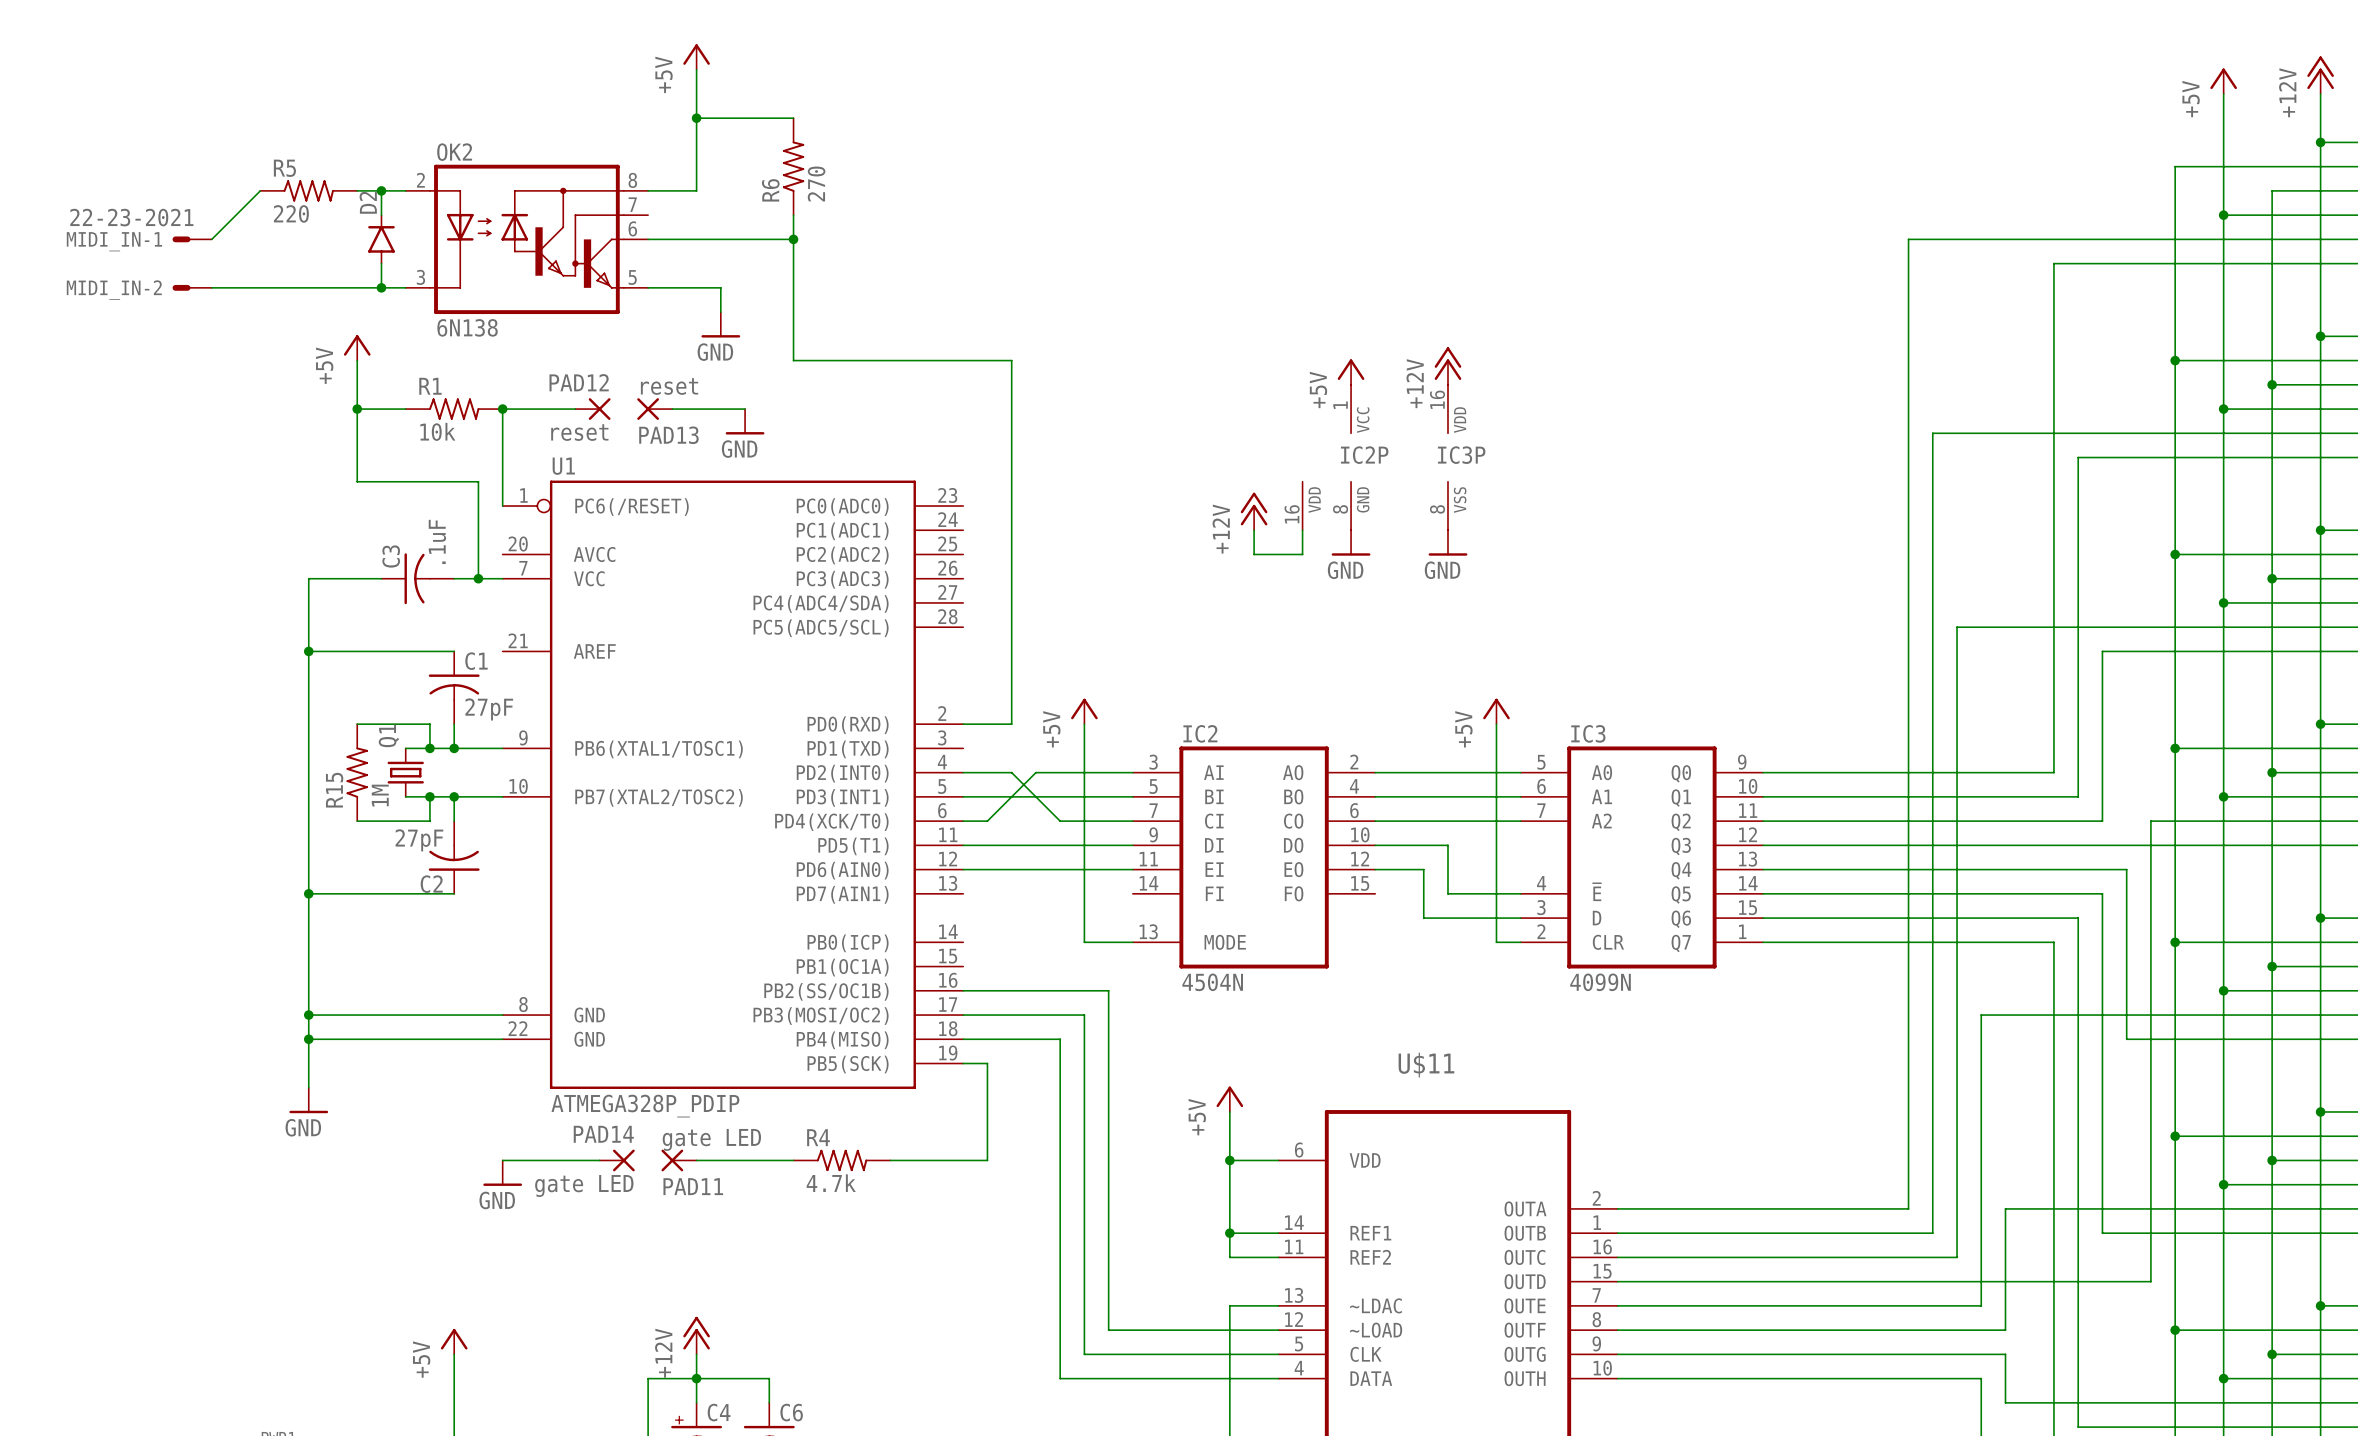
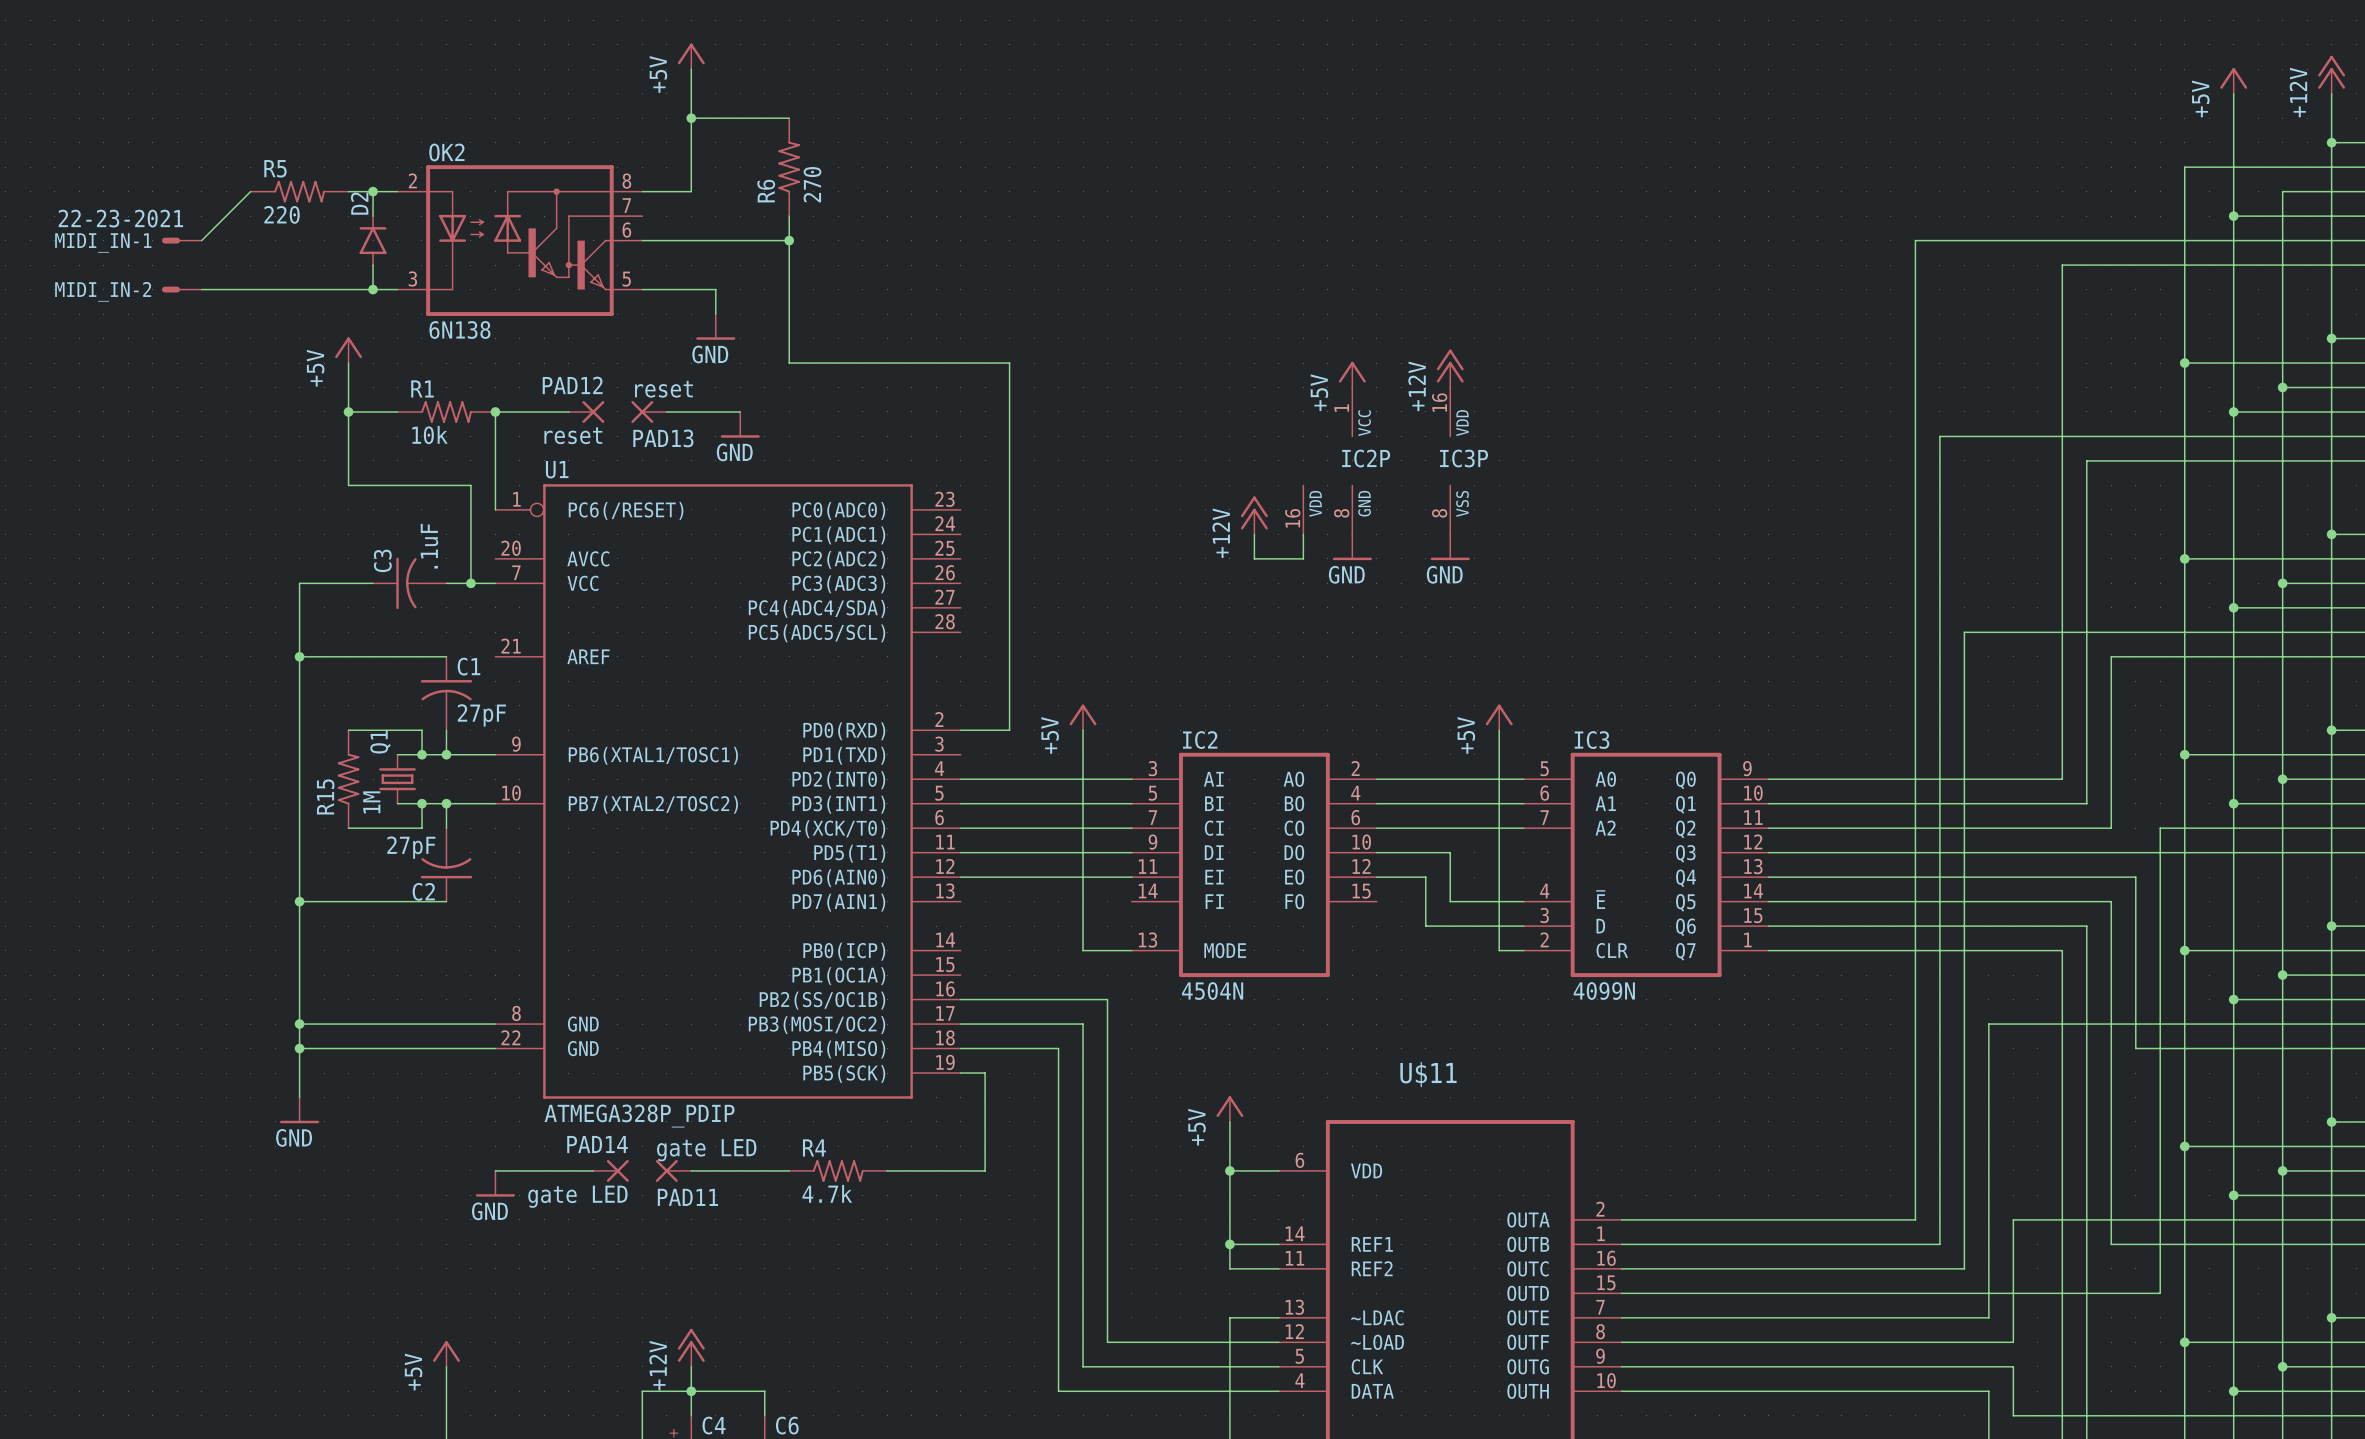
wire: (1011, 772) (1060, 821) -> (985, 828) (1058, 828)
wire: (1035, 772) (987, 821) -> (1034, 779) (1009, 779)

